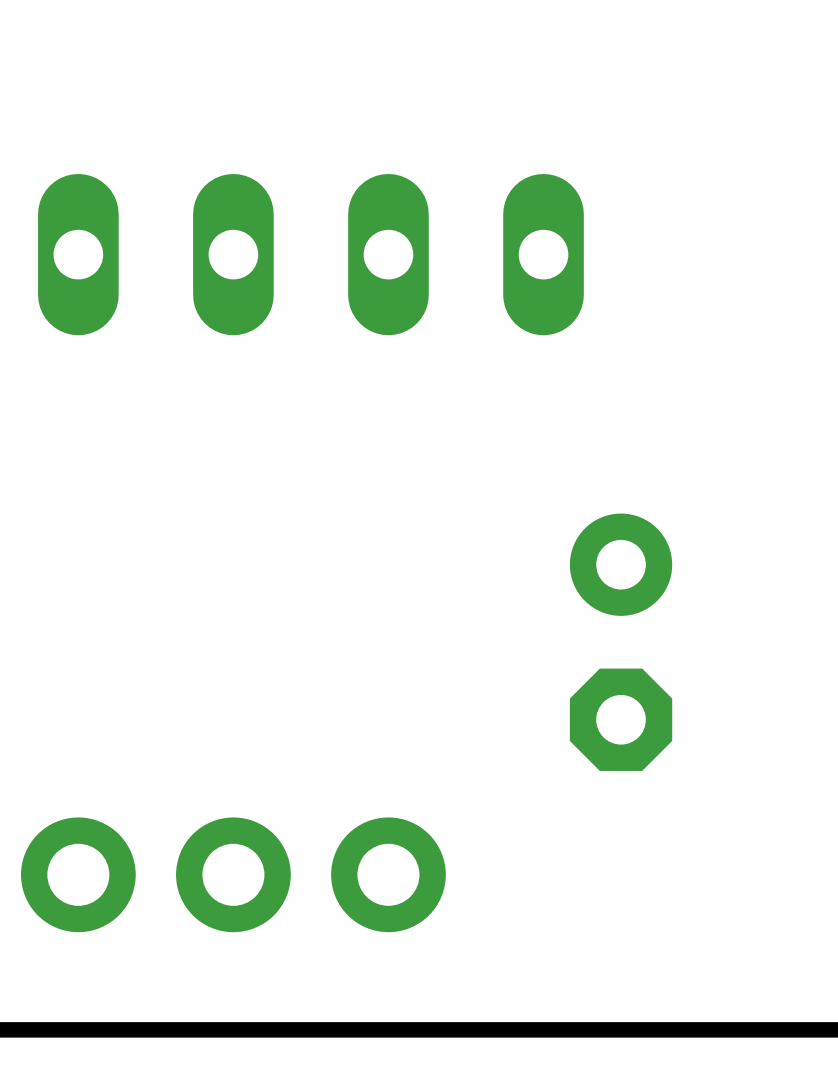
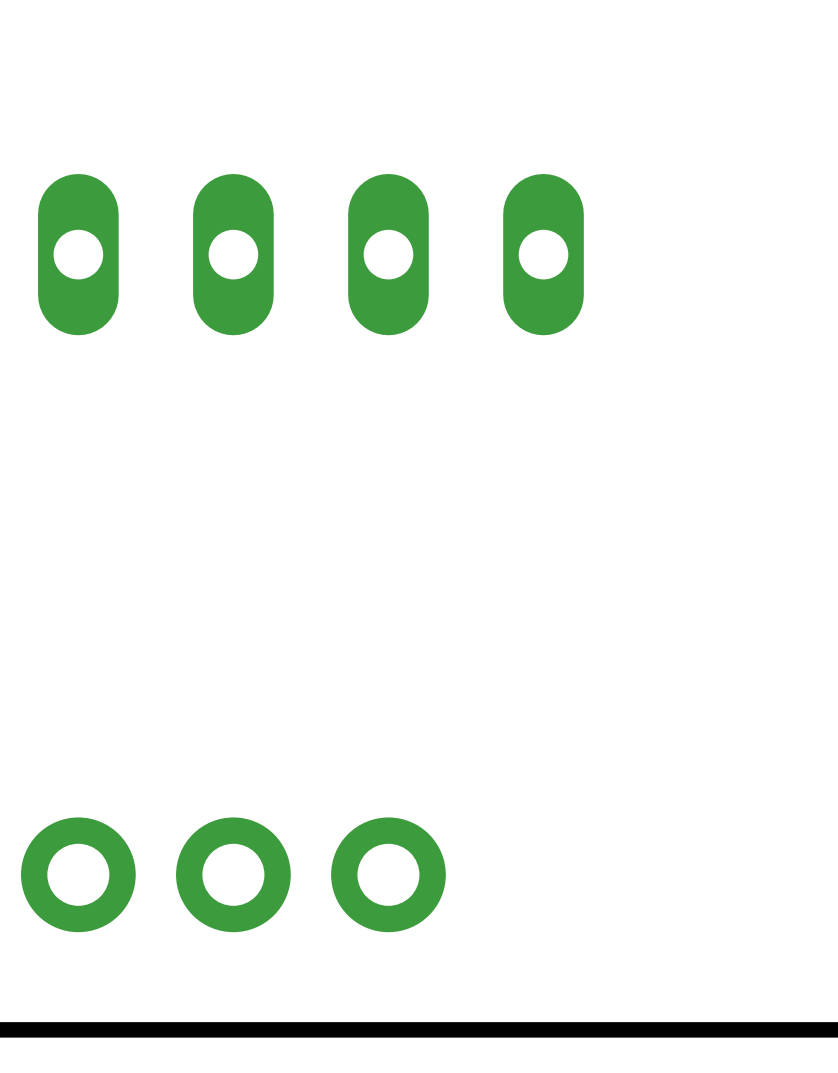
part: (621, 642) -> none

